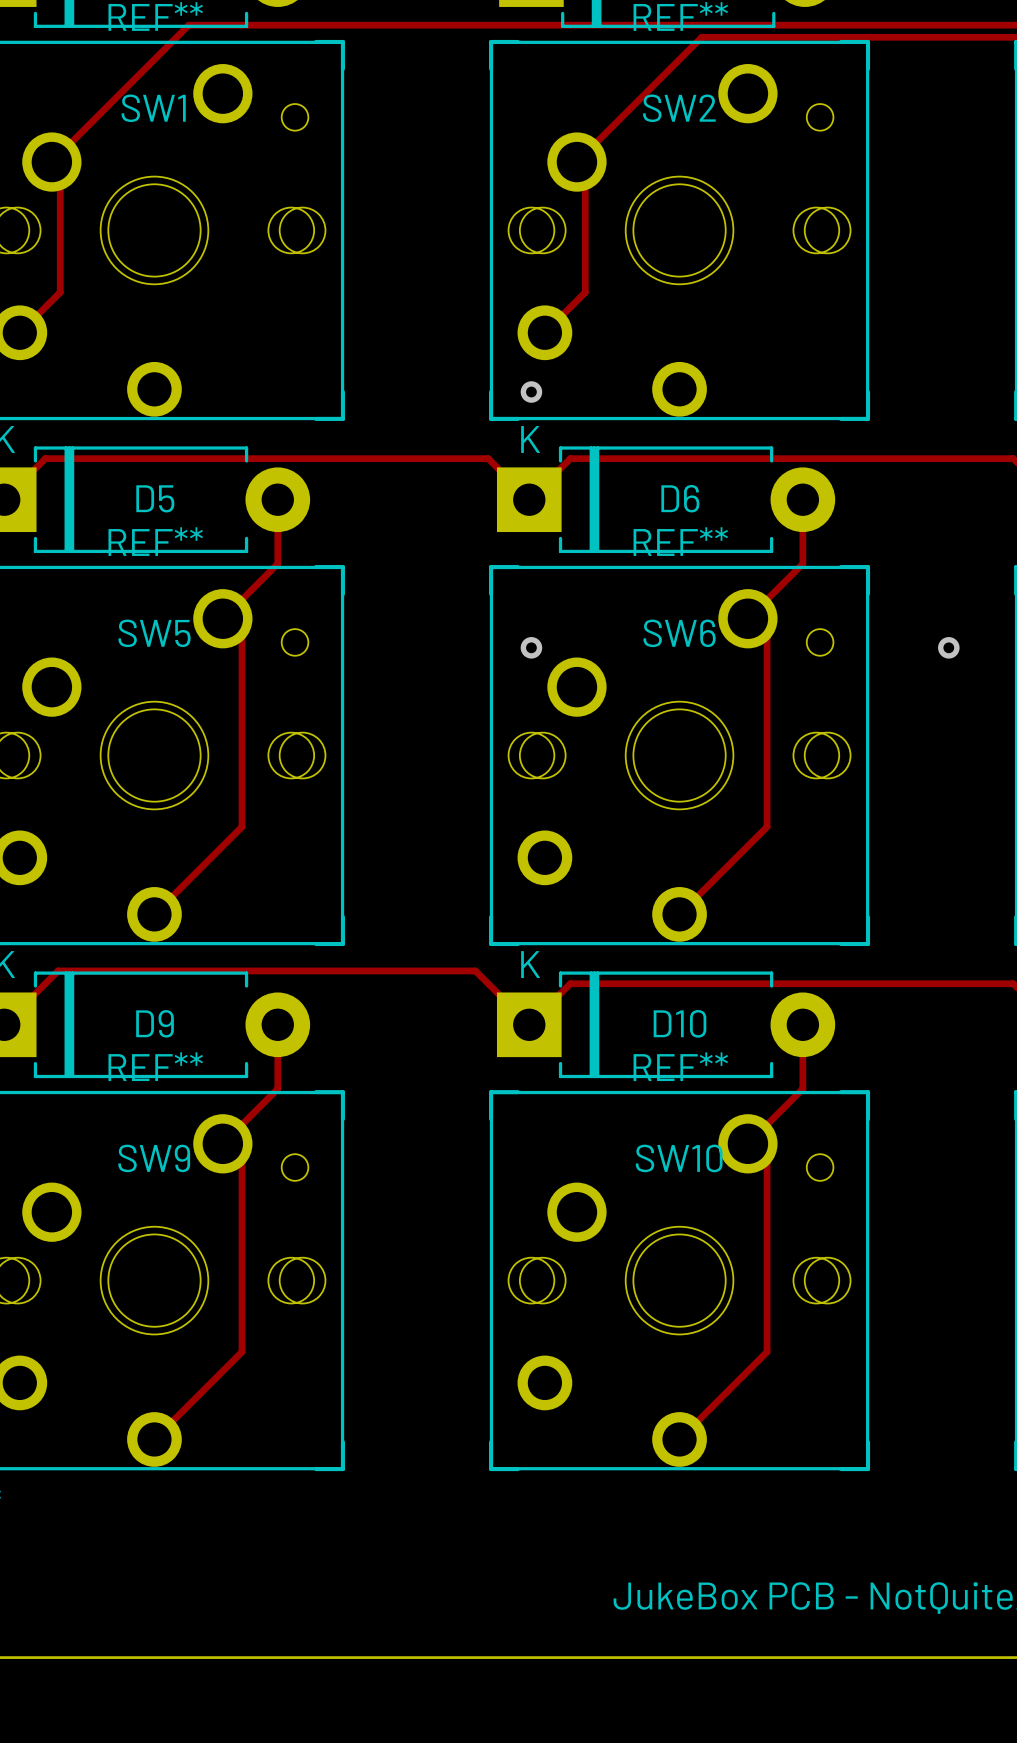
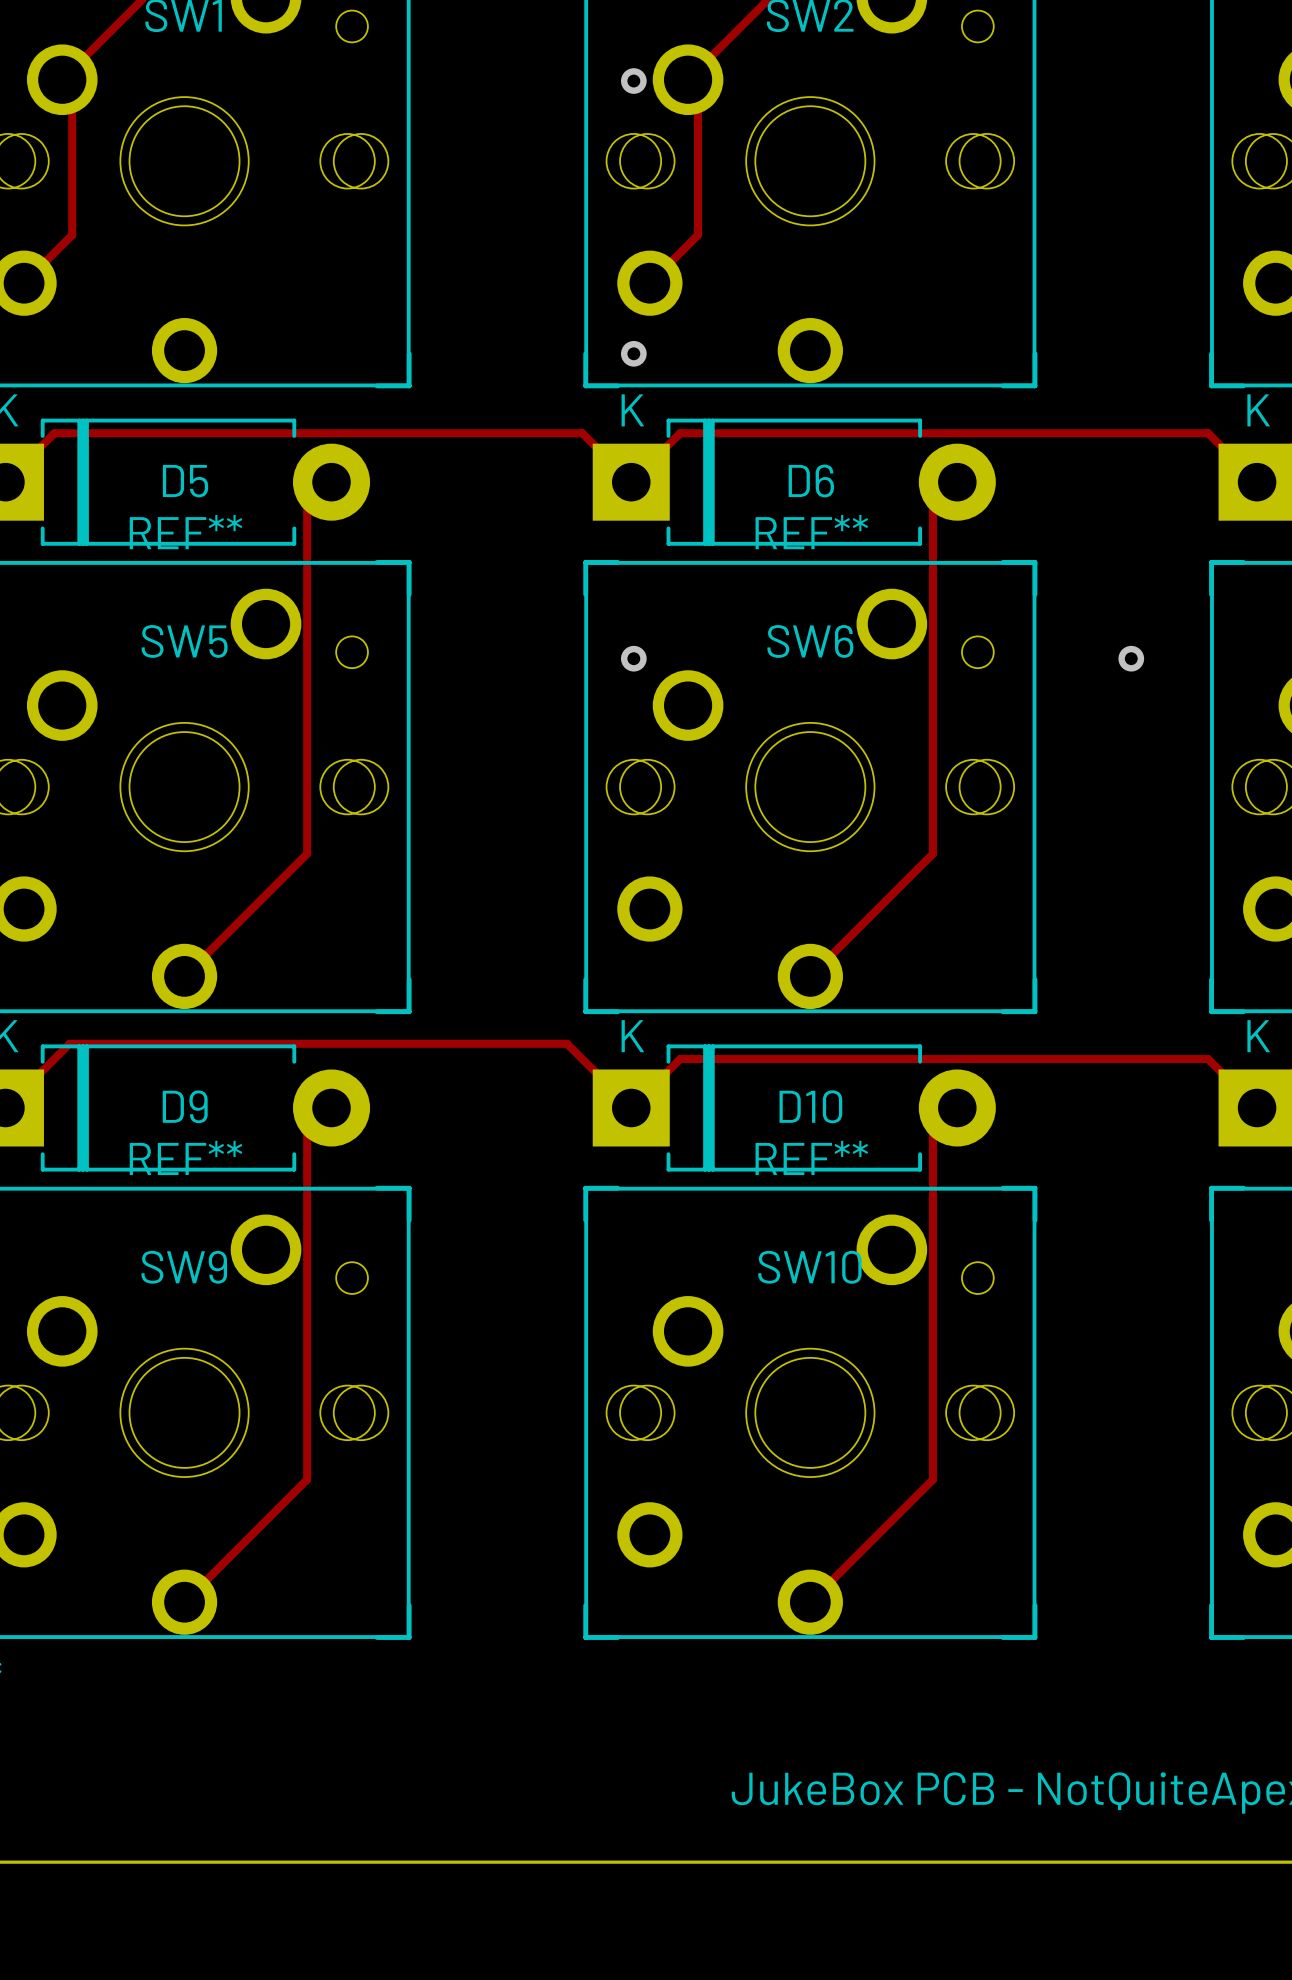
via: none -> (633, 81)
track: (277, 499) (277, 563) (222, 618) (241, 637) (241, 826) -> (307, 506) (307, 853) (288, 872)
track: (802, 499) (802, 563) (747, 618) (767, 637) (767, 826) -> (932, 506) (932, 853) (914, 872)
track: (277, 1024) (277, 1088) (222, 1143) (241, 1162) (241, 1351) -> (331, 1107) (307, 1132) (307, 1479) (288, 1497)
track: (802, 1024) (802, 1088) (747, 1143) (767, 1162) (767, 1351) -> (957, 1107) (932, 1132) (932, 1479) (914, 1497)

